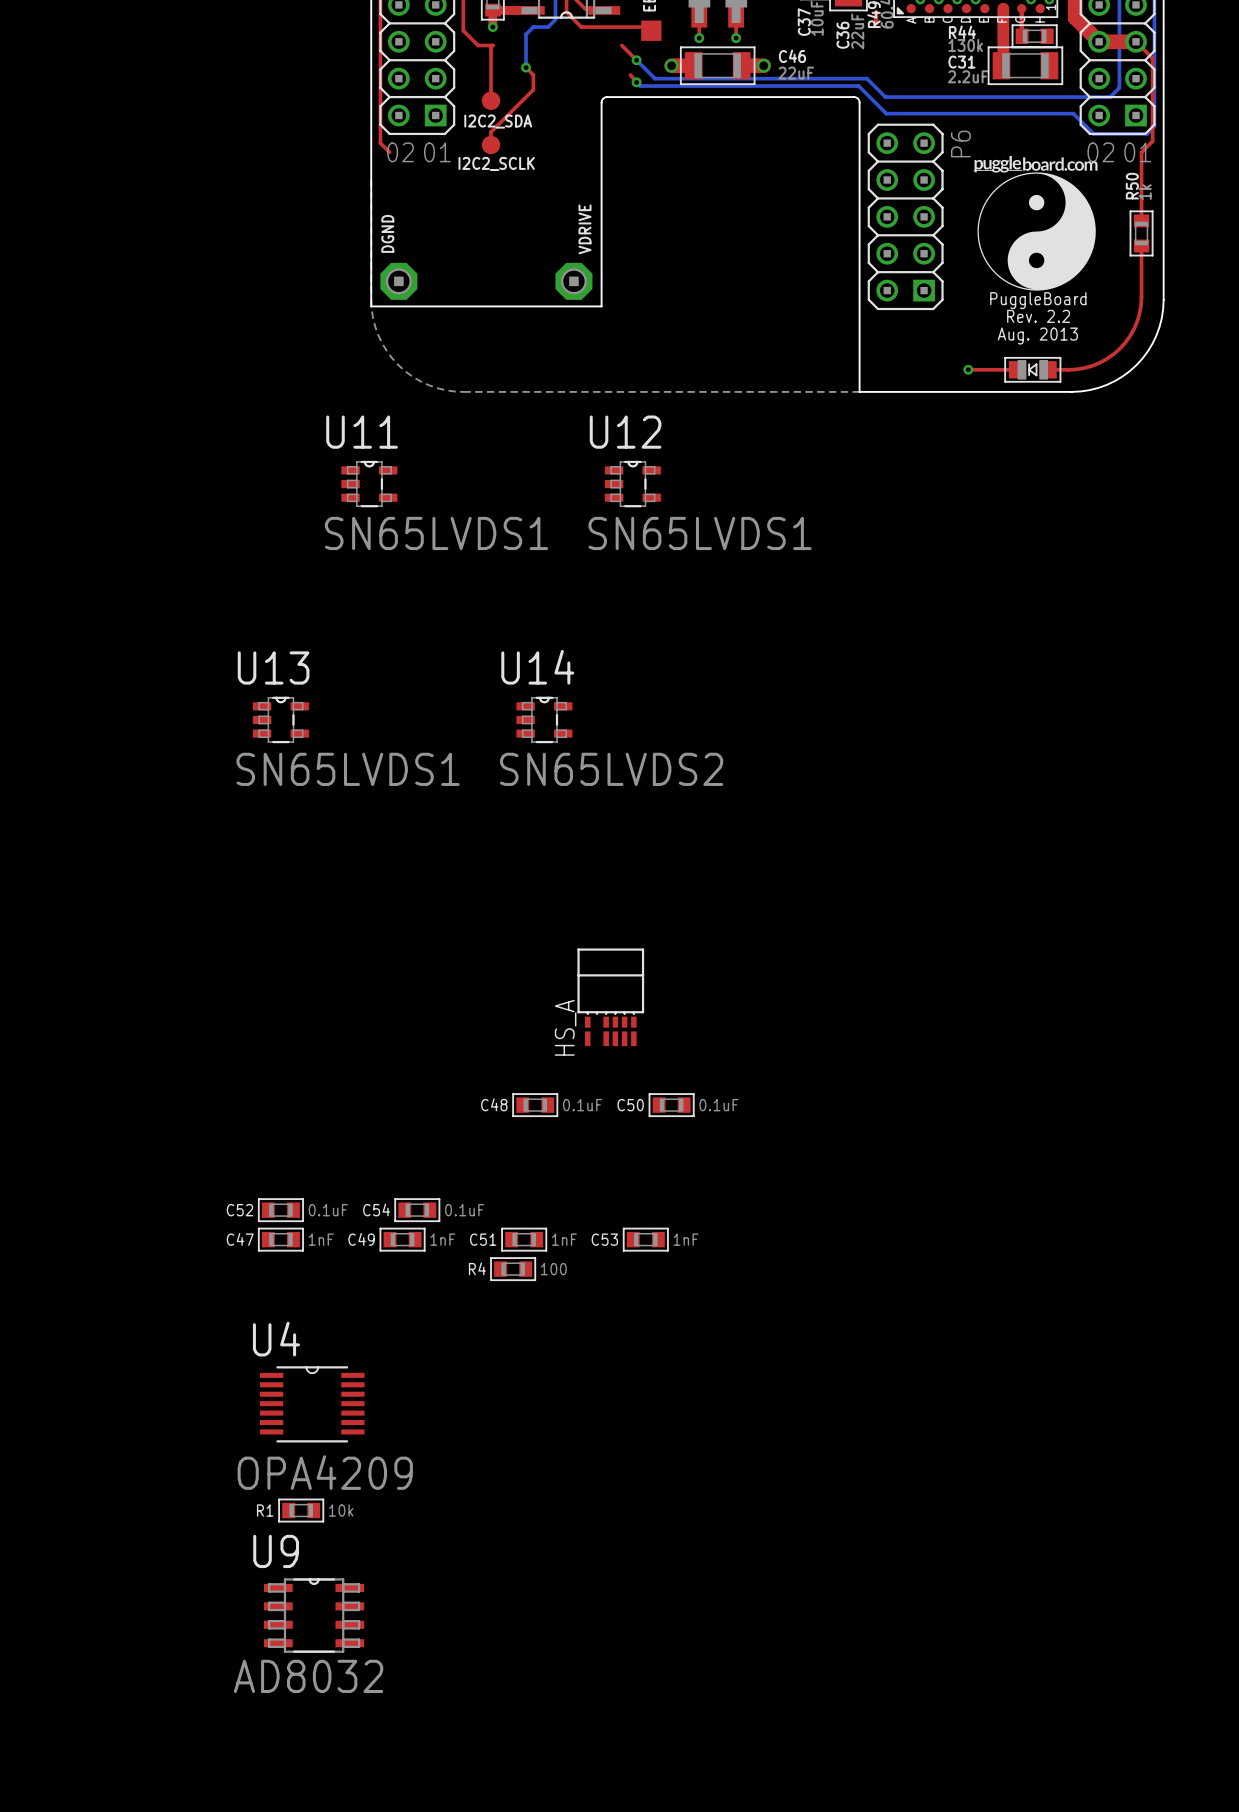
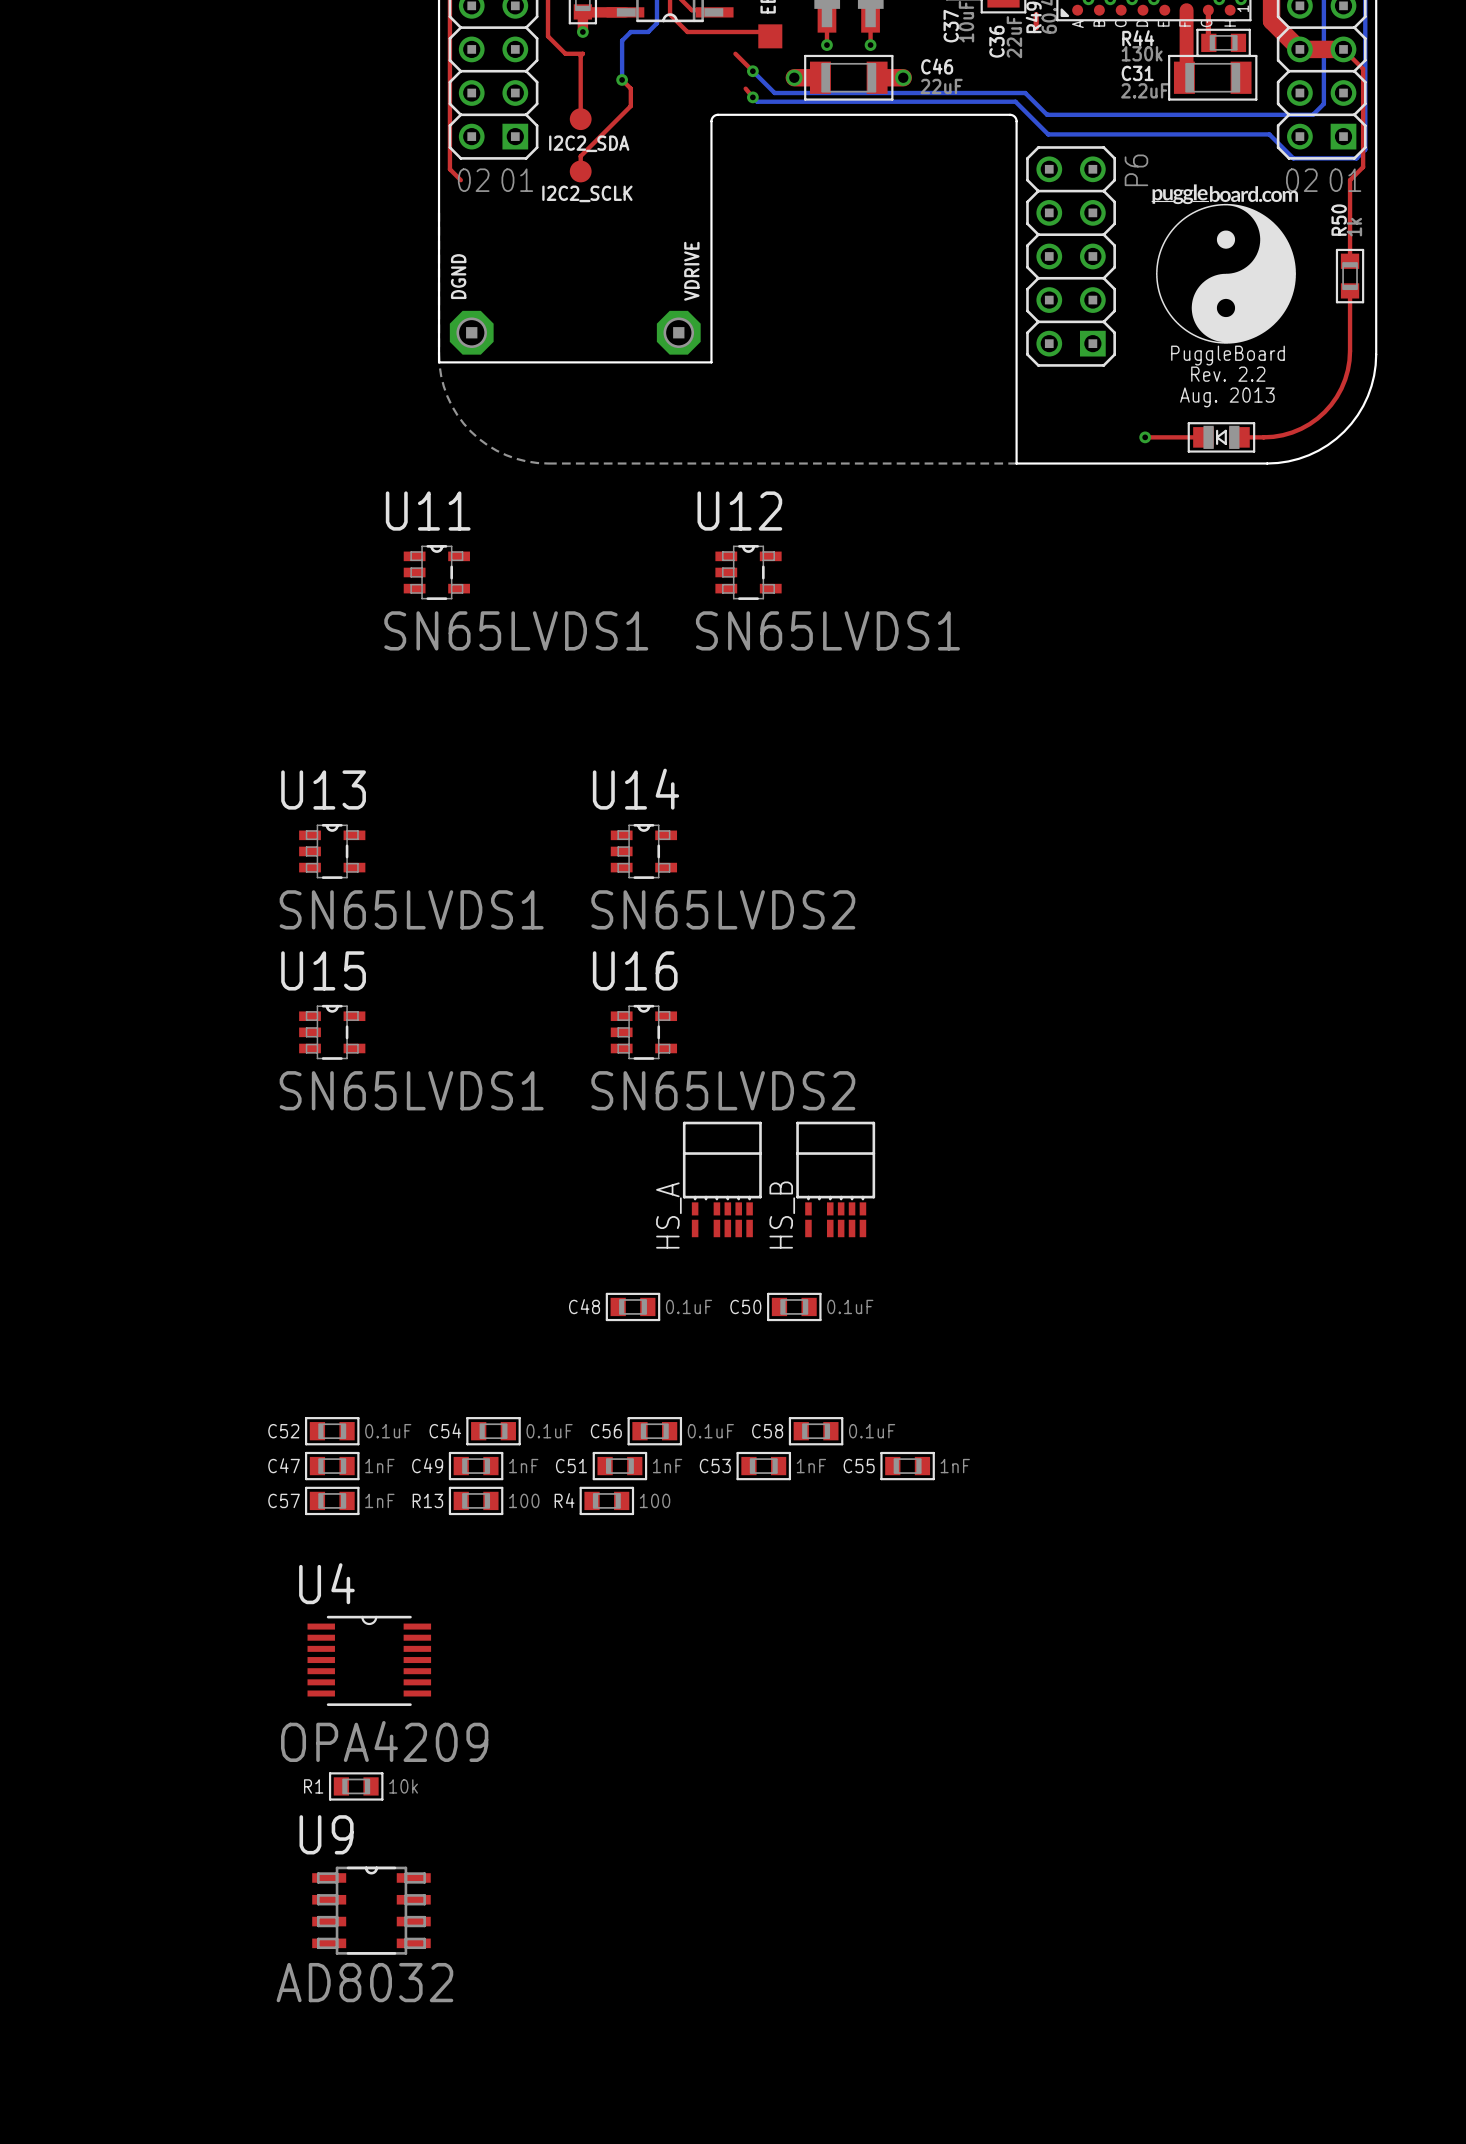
U15: none -> SN65LVDS1 (332, 1032)
U16: none -> SN65LVDS2 (643, 1032)
HS_B: none -> (835, 1179)
C56: none -> 0.1uF (654, 1431)
C58: none -> 0.1uF (816, 1431)
C55: none -> 1nF (907, 1466)
C57: none -> 1nF (332, 1500)
R13: none -> 100 (476, 1500)

